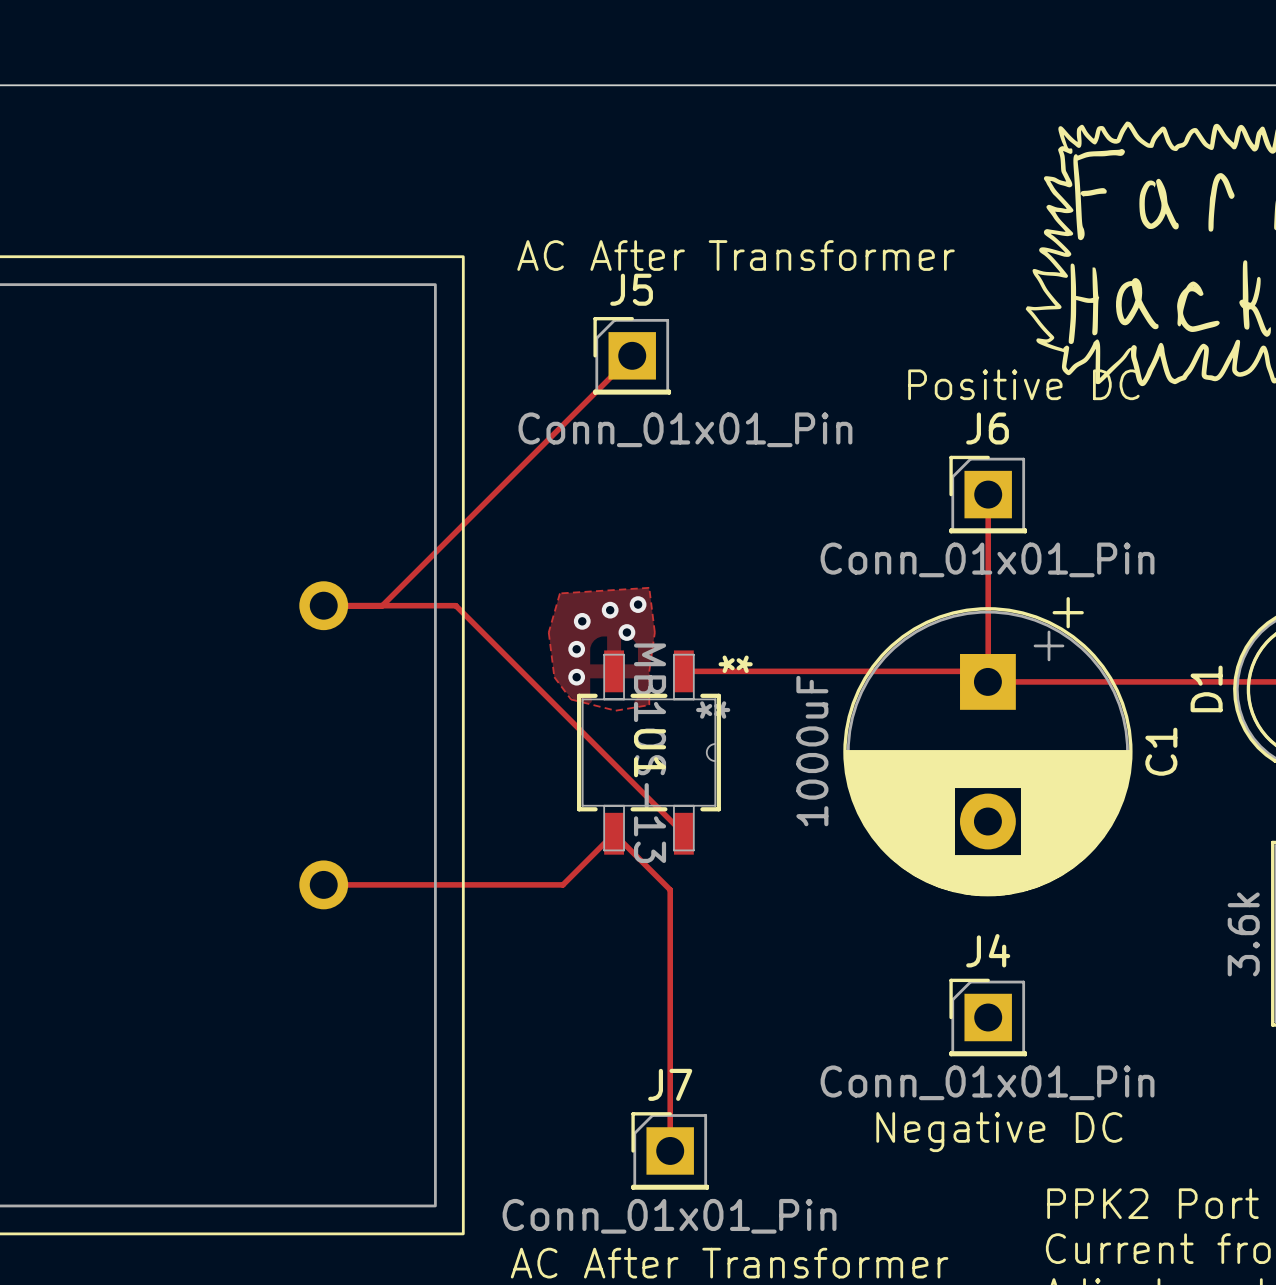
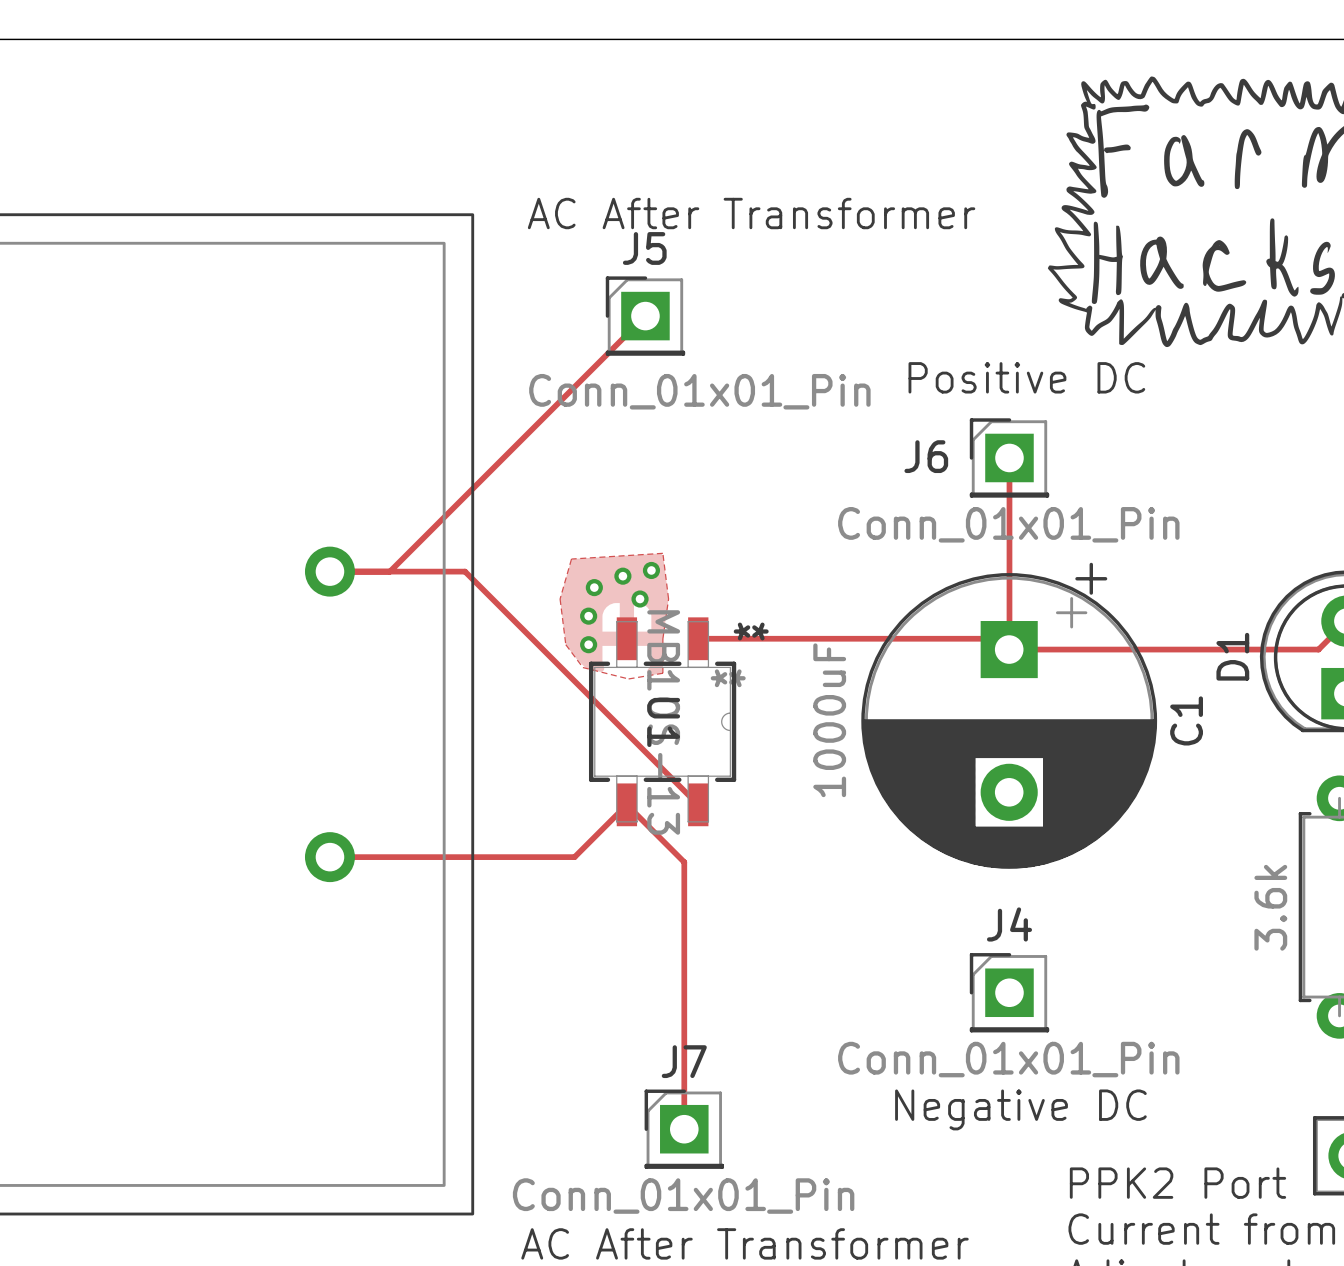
text position: Positive DC (1023, 384) -> Positive DC (1026, 377)
J6 name position: J6 (987, 428) -> J6 (926, 456)

